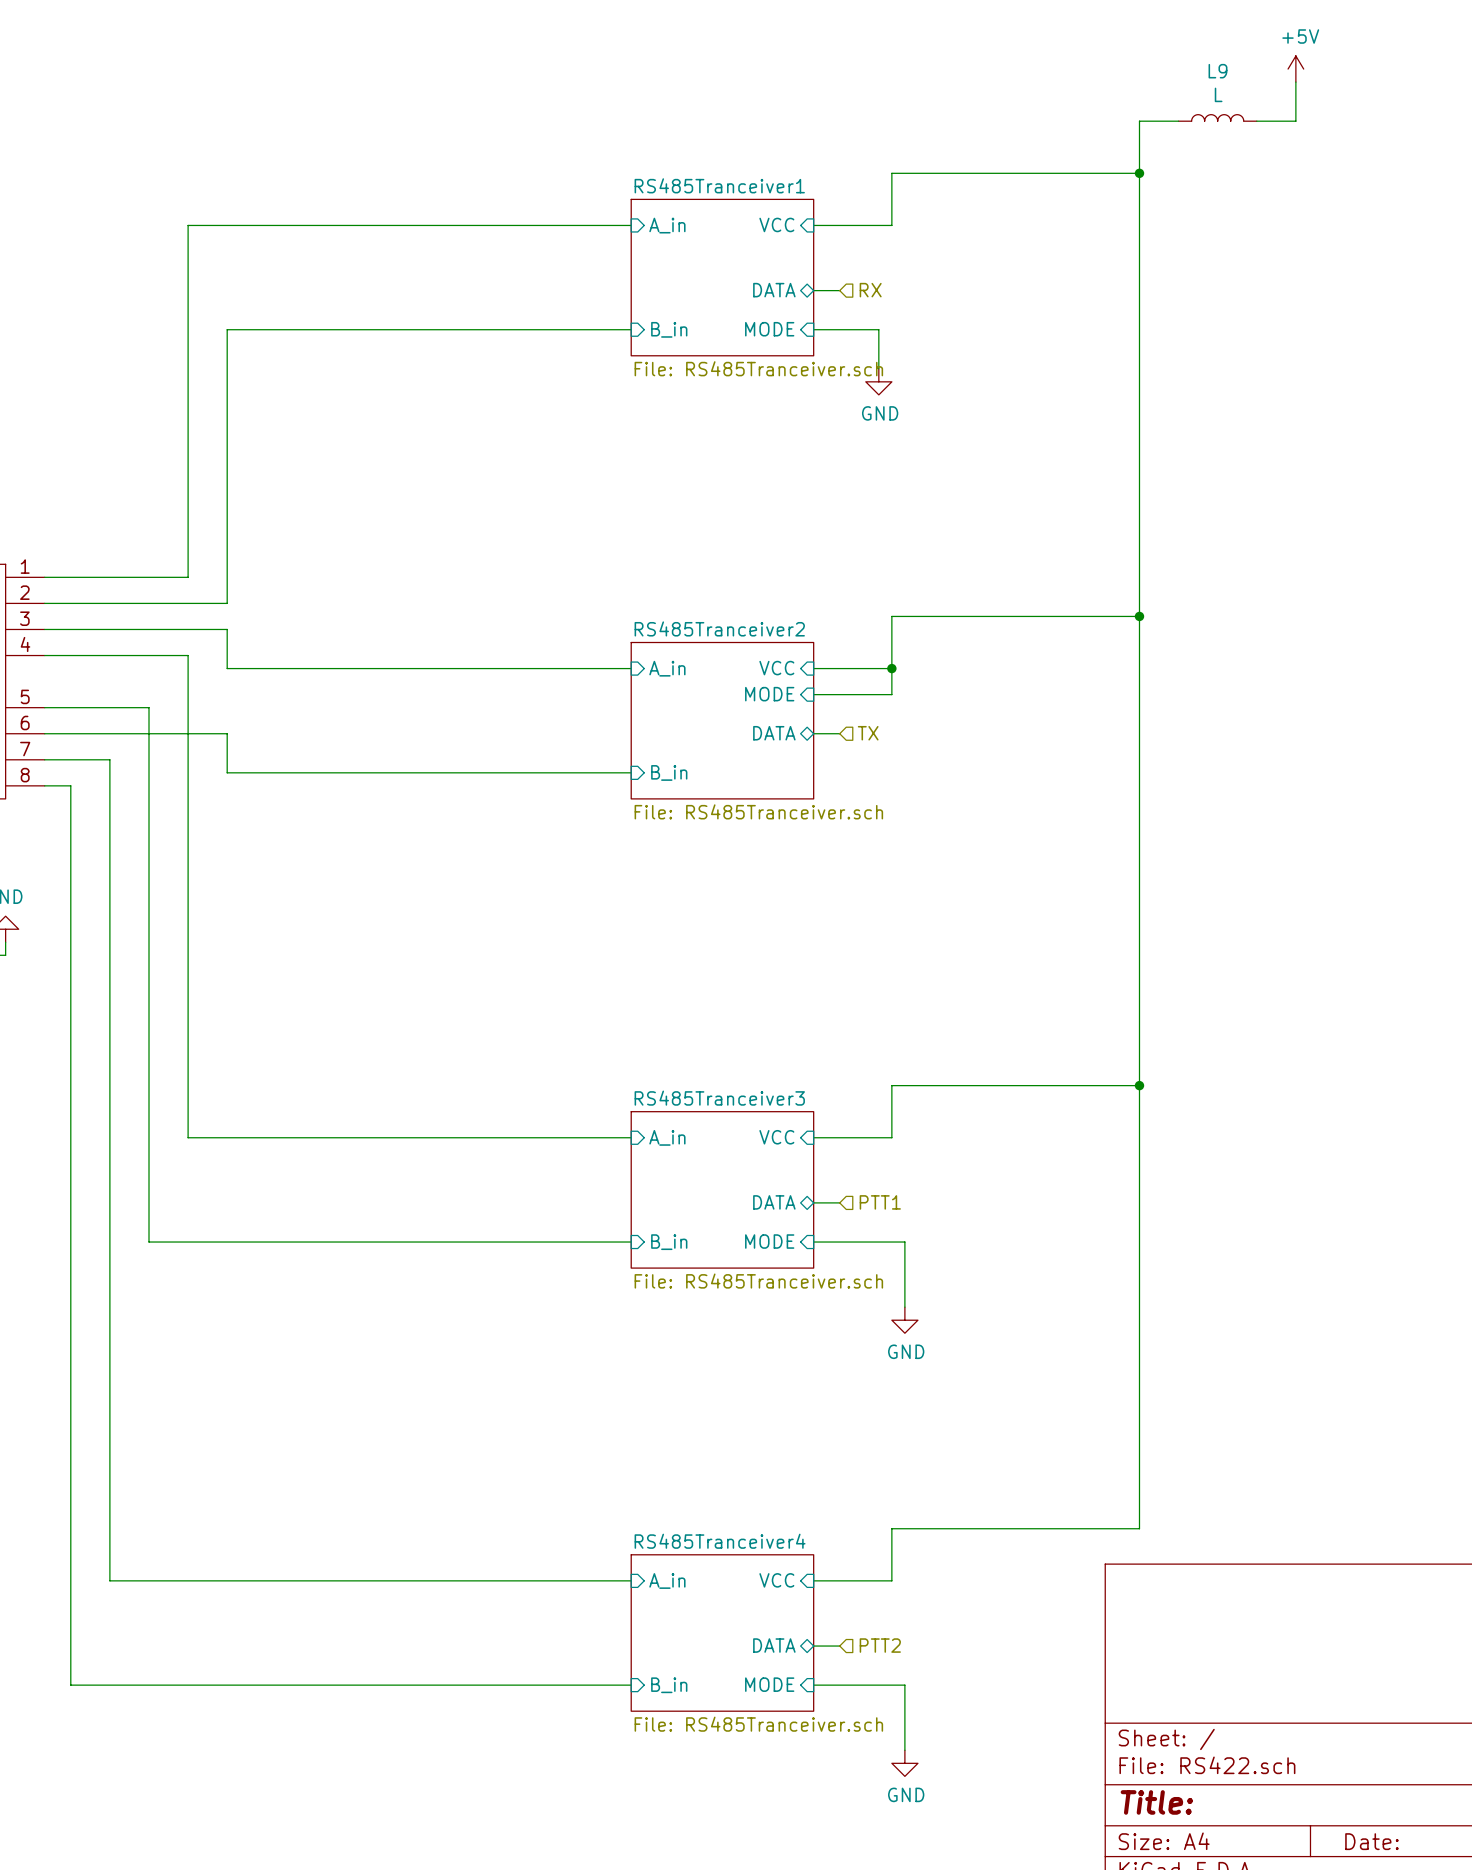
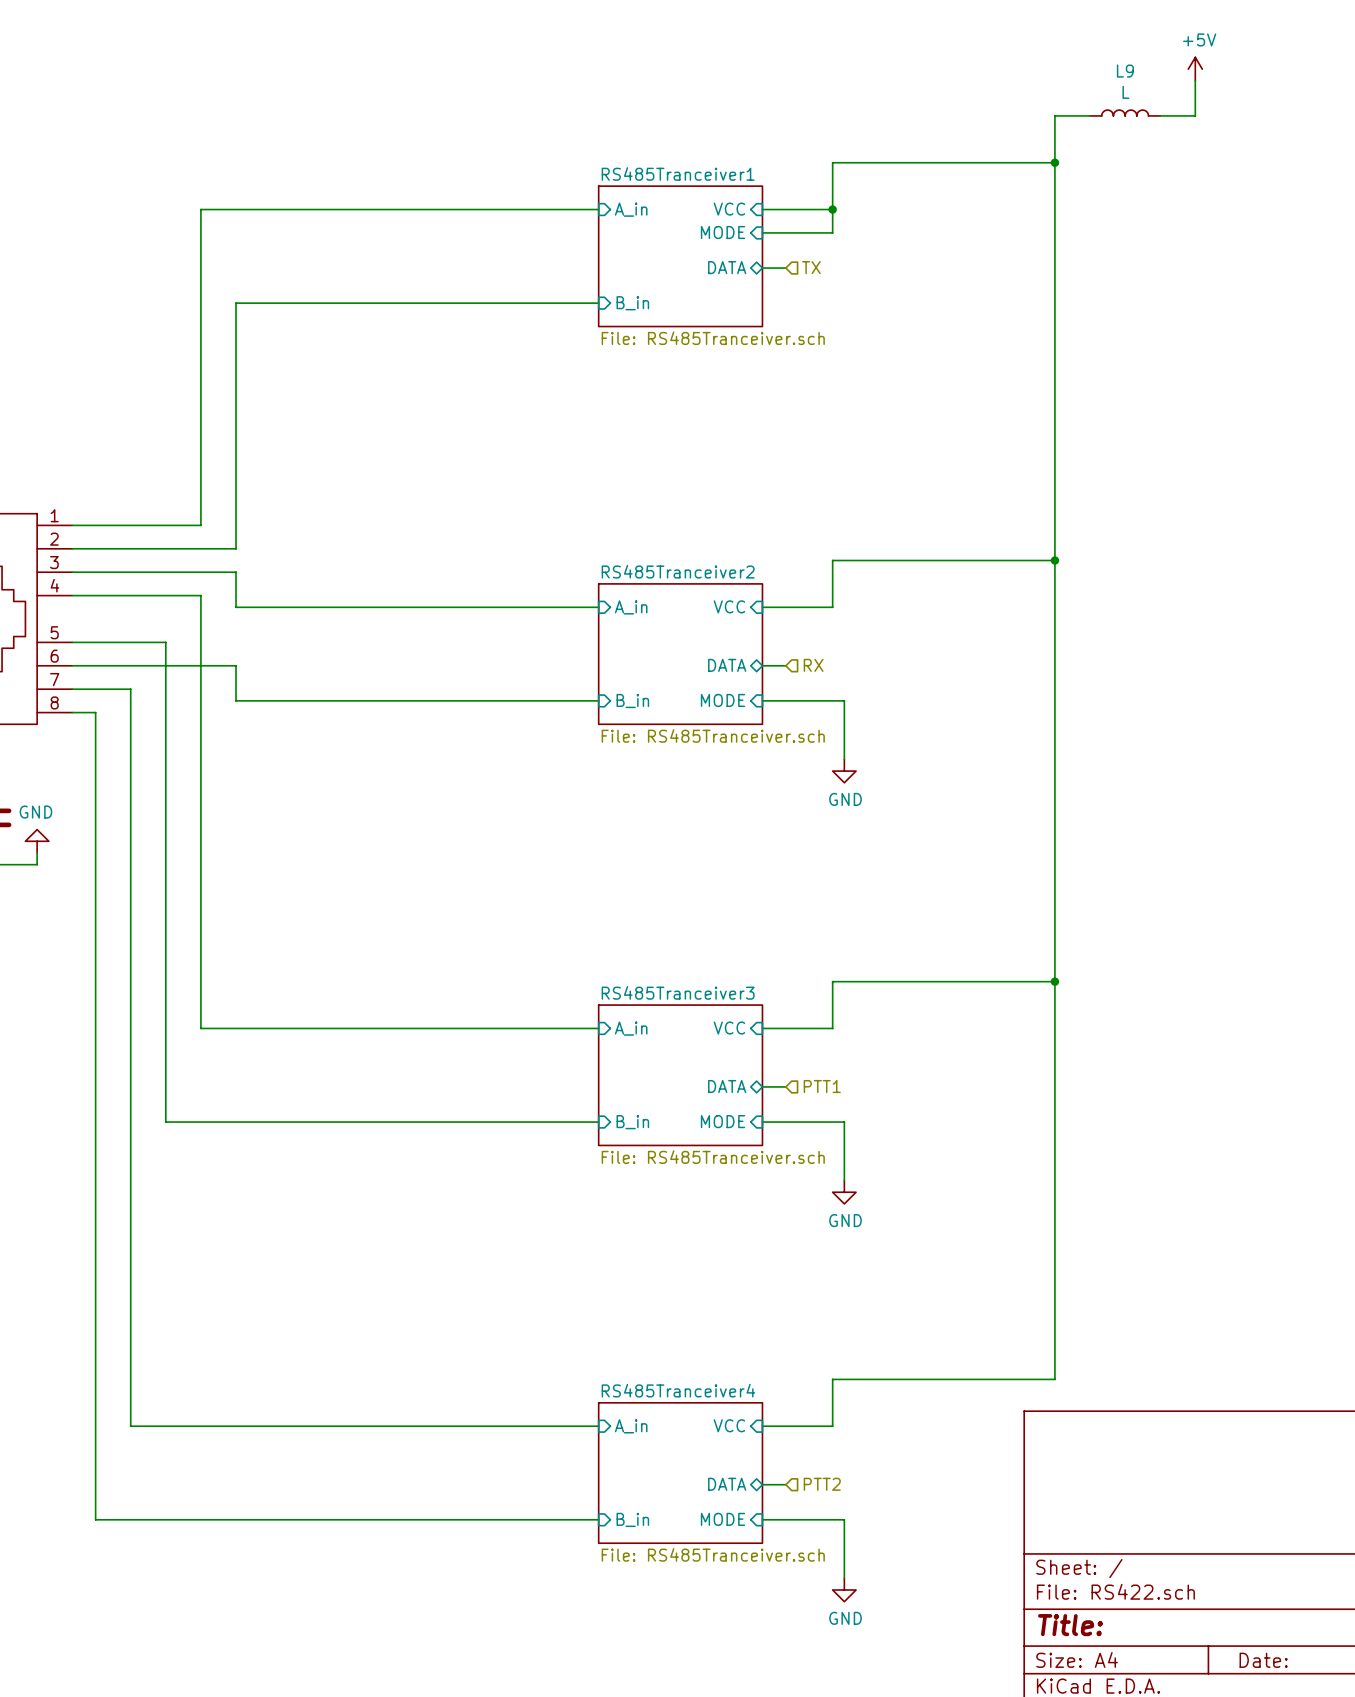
wire: none -> (832, 209) (832, 232) (762, 232)
junction: none -> (832, 209)
hierarchical label: RX (870, 290) -> TX (811, 267)
sheet pin position: MODE (769, 329) -> MODE (723, 232)
wire: (813, 329) (878, 329) (878, 368) -> none
power symbol: GND (878, 381) -> none
wire: (891, 668) (891, 694) (813, 694) -> none
junction: (891, 668) -> none
sheet pin position: MODE (769, 694) -> MODE (723, 700)
hierarchical label: TX (868, 733) -> RX (813, 665)
wire: none -> (762, 700) (844, 700) (844, 759)
power symbol: none -> GND (844, 771)

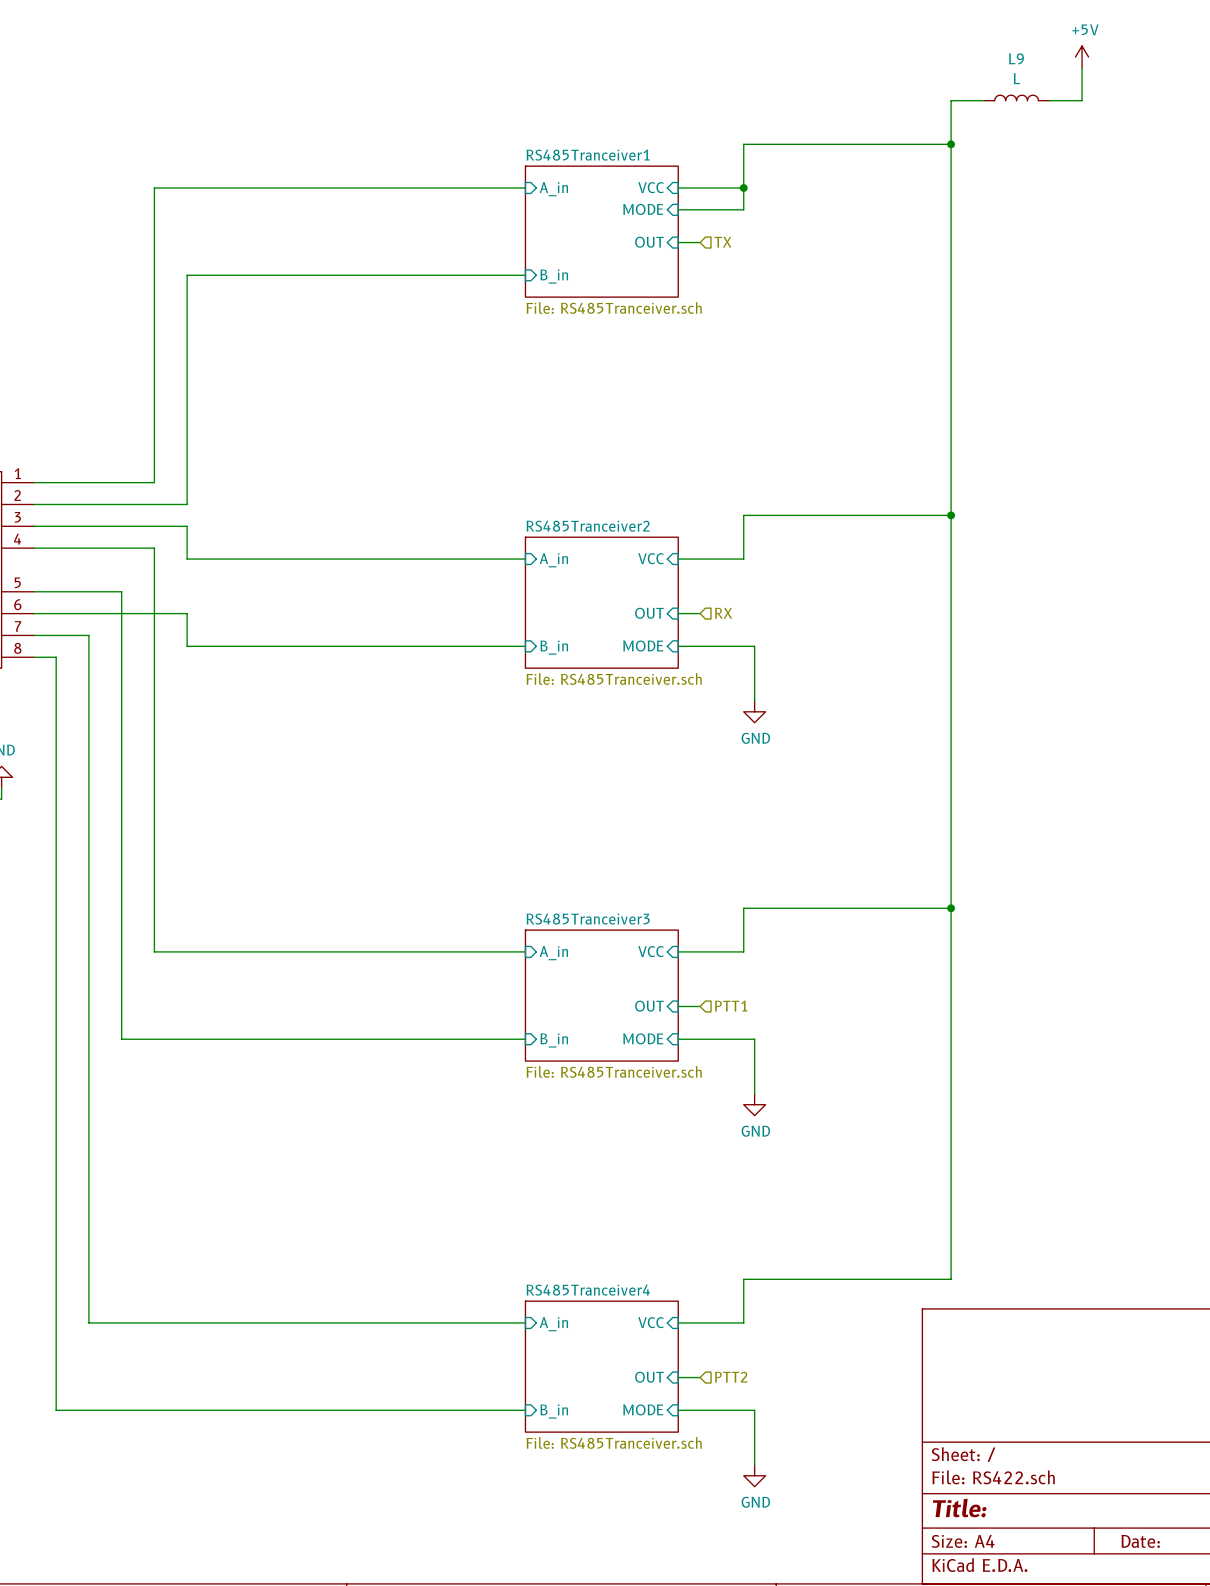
sheet pin shape: bidirectional (727, 267) -> input (649, 242)
sheet pin: DATA (727, 267) -> OUT (649, 242)
sheet pin shape: bidirectional (727, 665) -> input (649, 613)
sheet pin: DATA (727, 665) -> OUT (649, 613)
sheet pin shape: bidirectional (727, 1086) -> input (649, 1006)
sheet pin: DATA (727, 1086) -> OUT (649, 1006)
sheet pin shape: bidirectional (727, 1484) -> input (649, 1377)
sheet pin: DATA (727, 1484) -> OUT (649, 1377)

